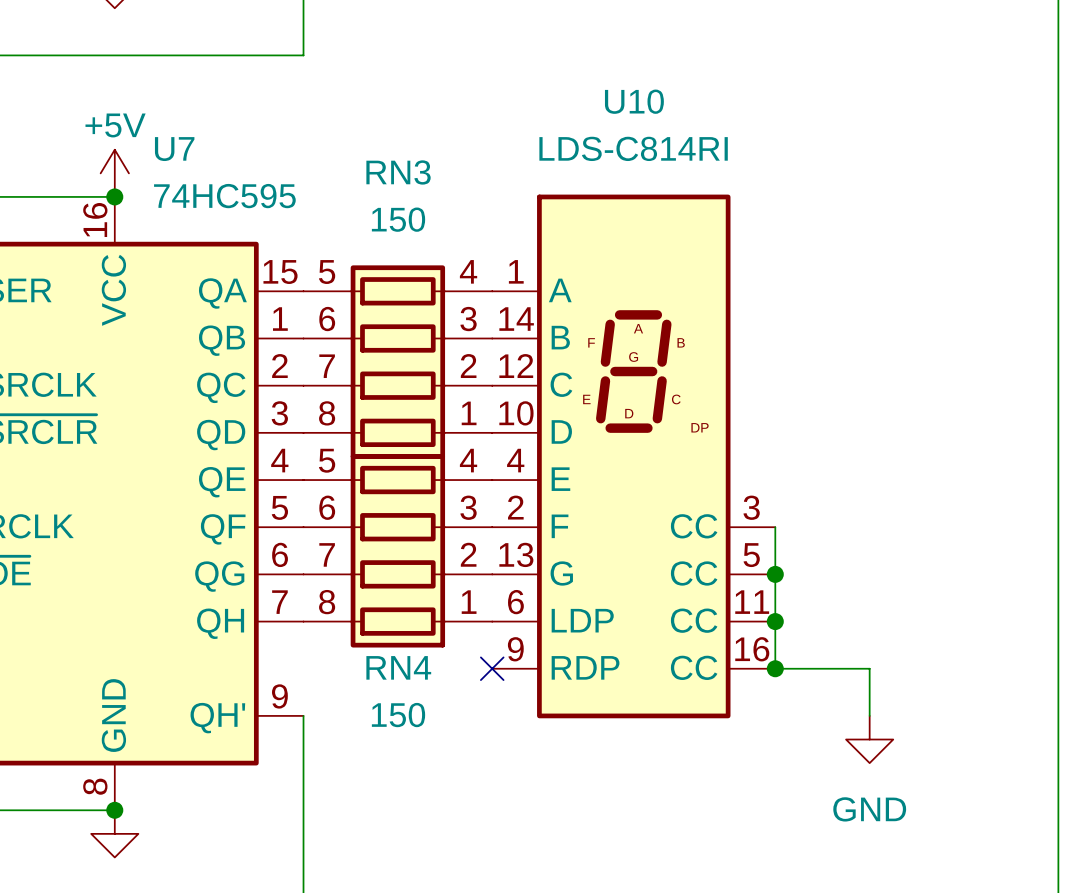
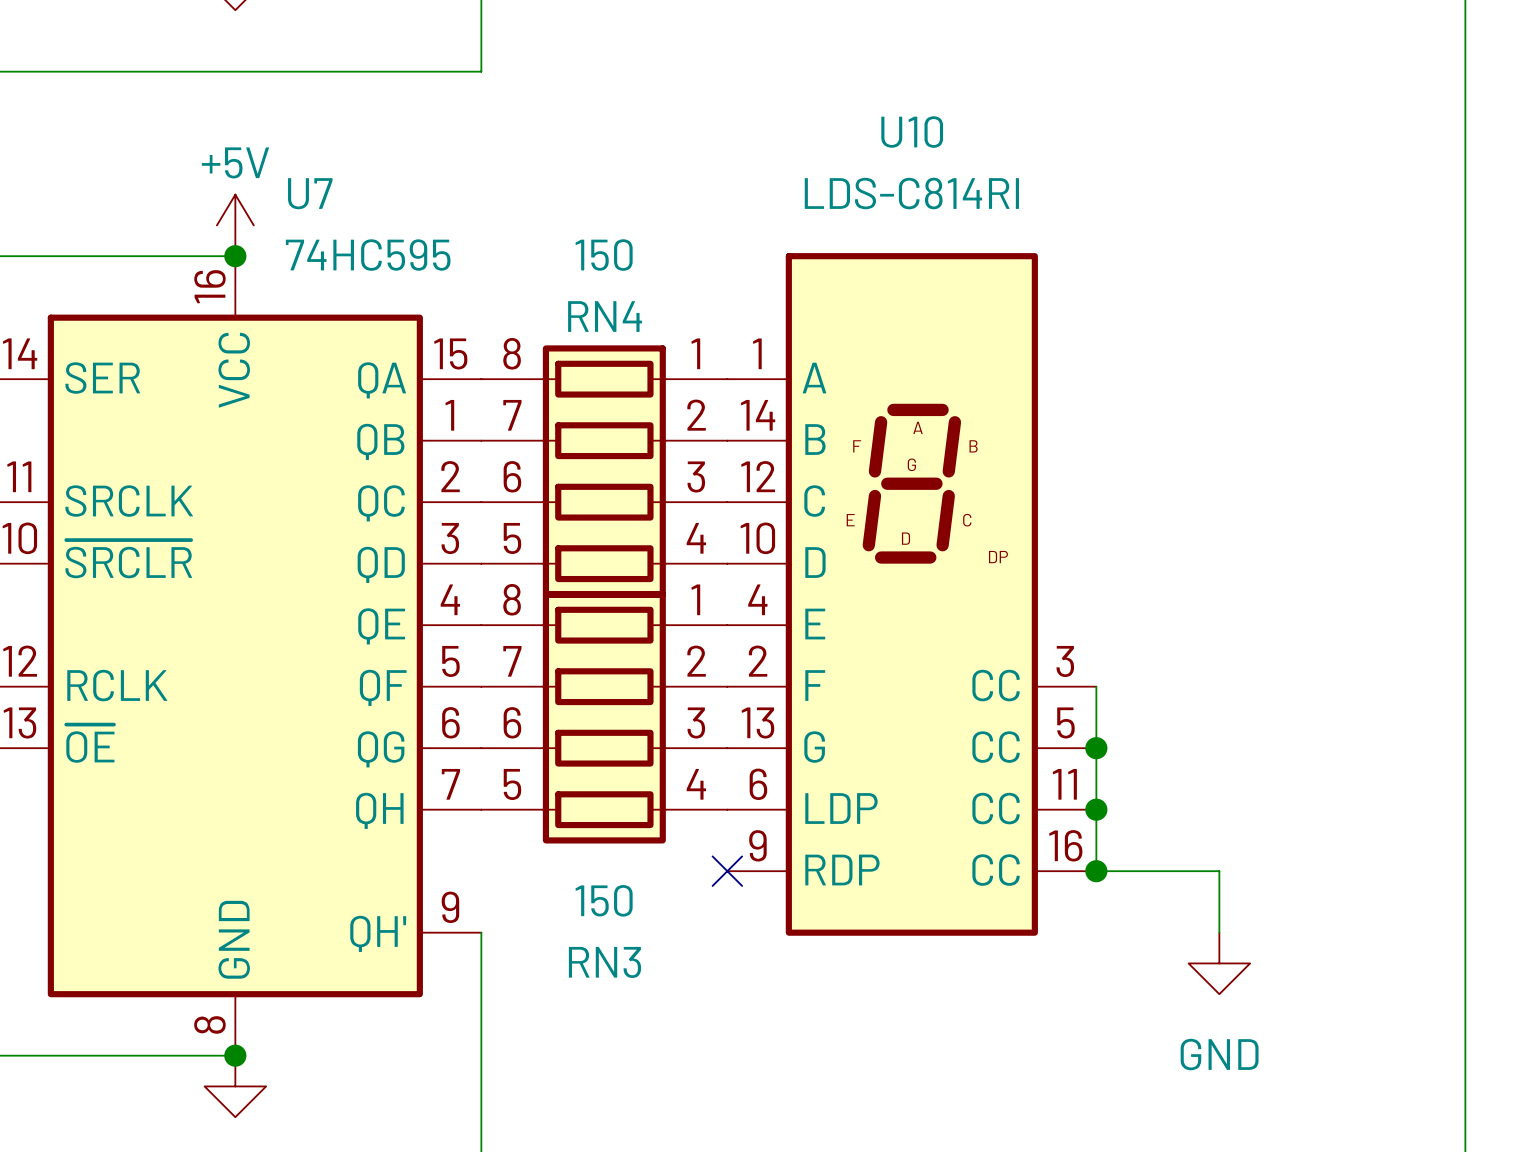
RN3 flip: as is (397, 362) -> up-down (604, 717)
RN3 position: (397, 362) -> (604, 717)
RN4 flip: as is (397, 550) -> up-down (604, 471)
RN4 position: (397, 550) -> (604, 471)

